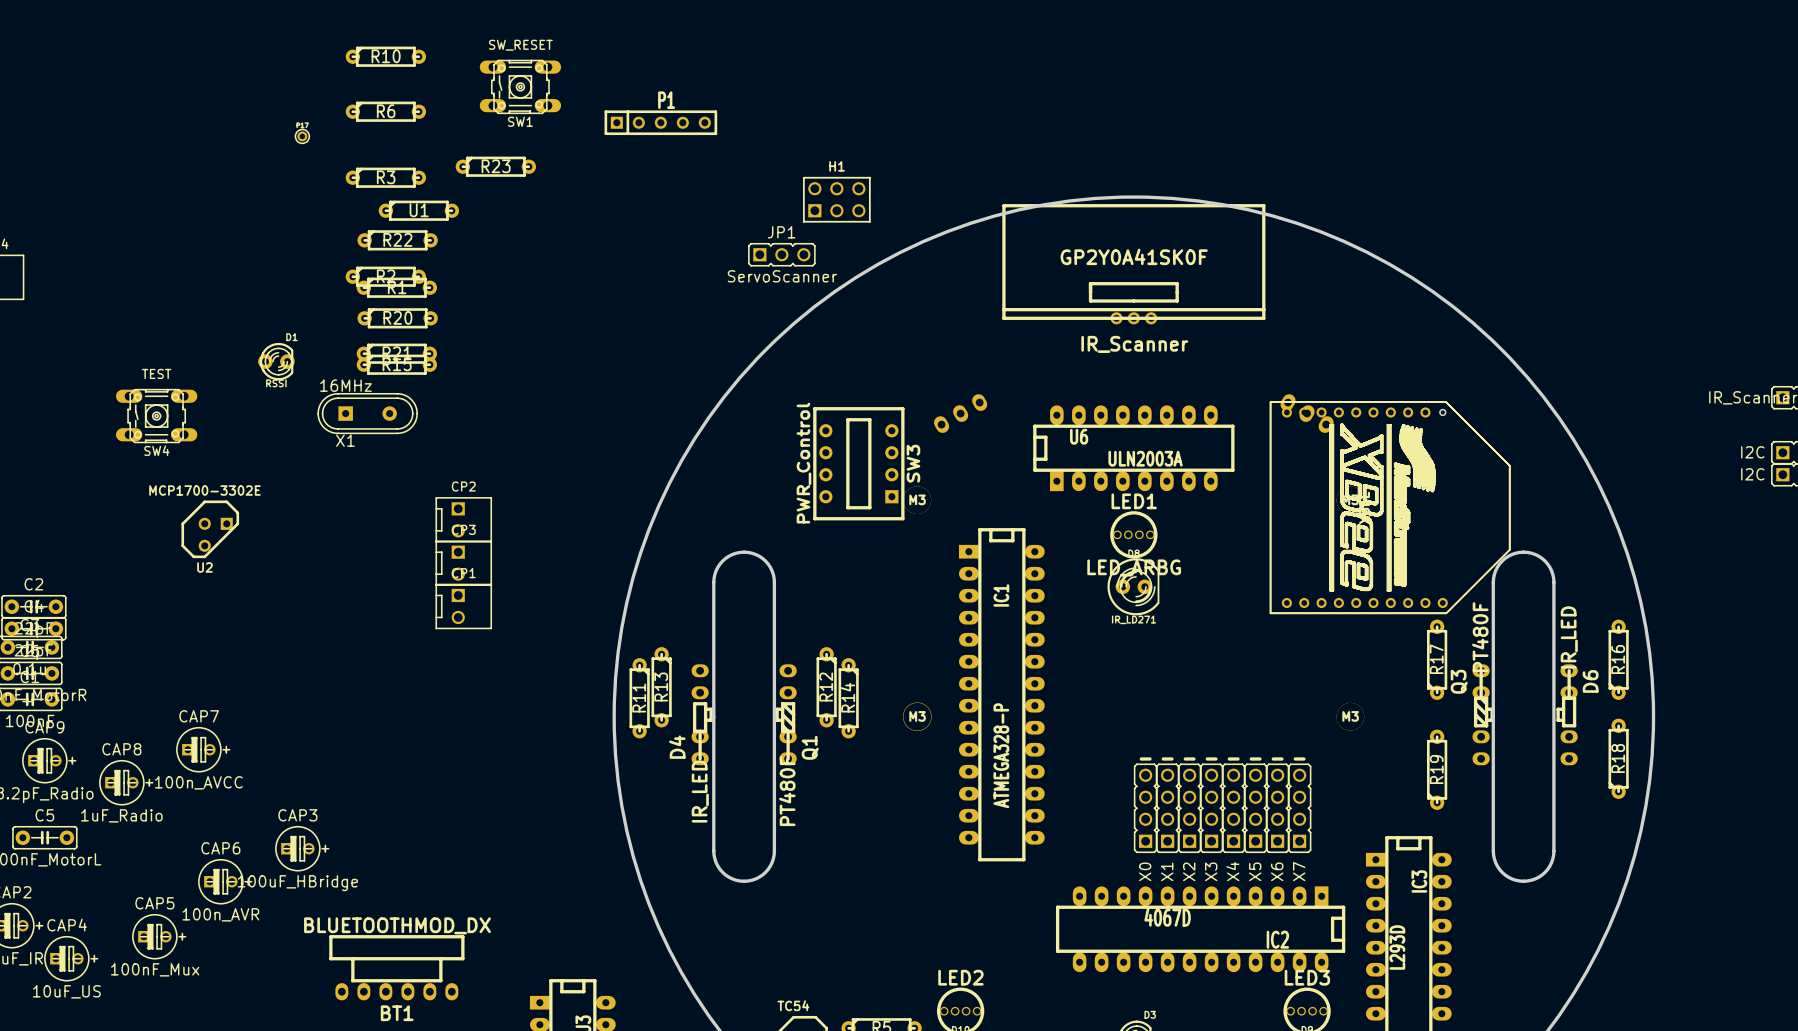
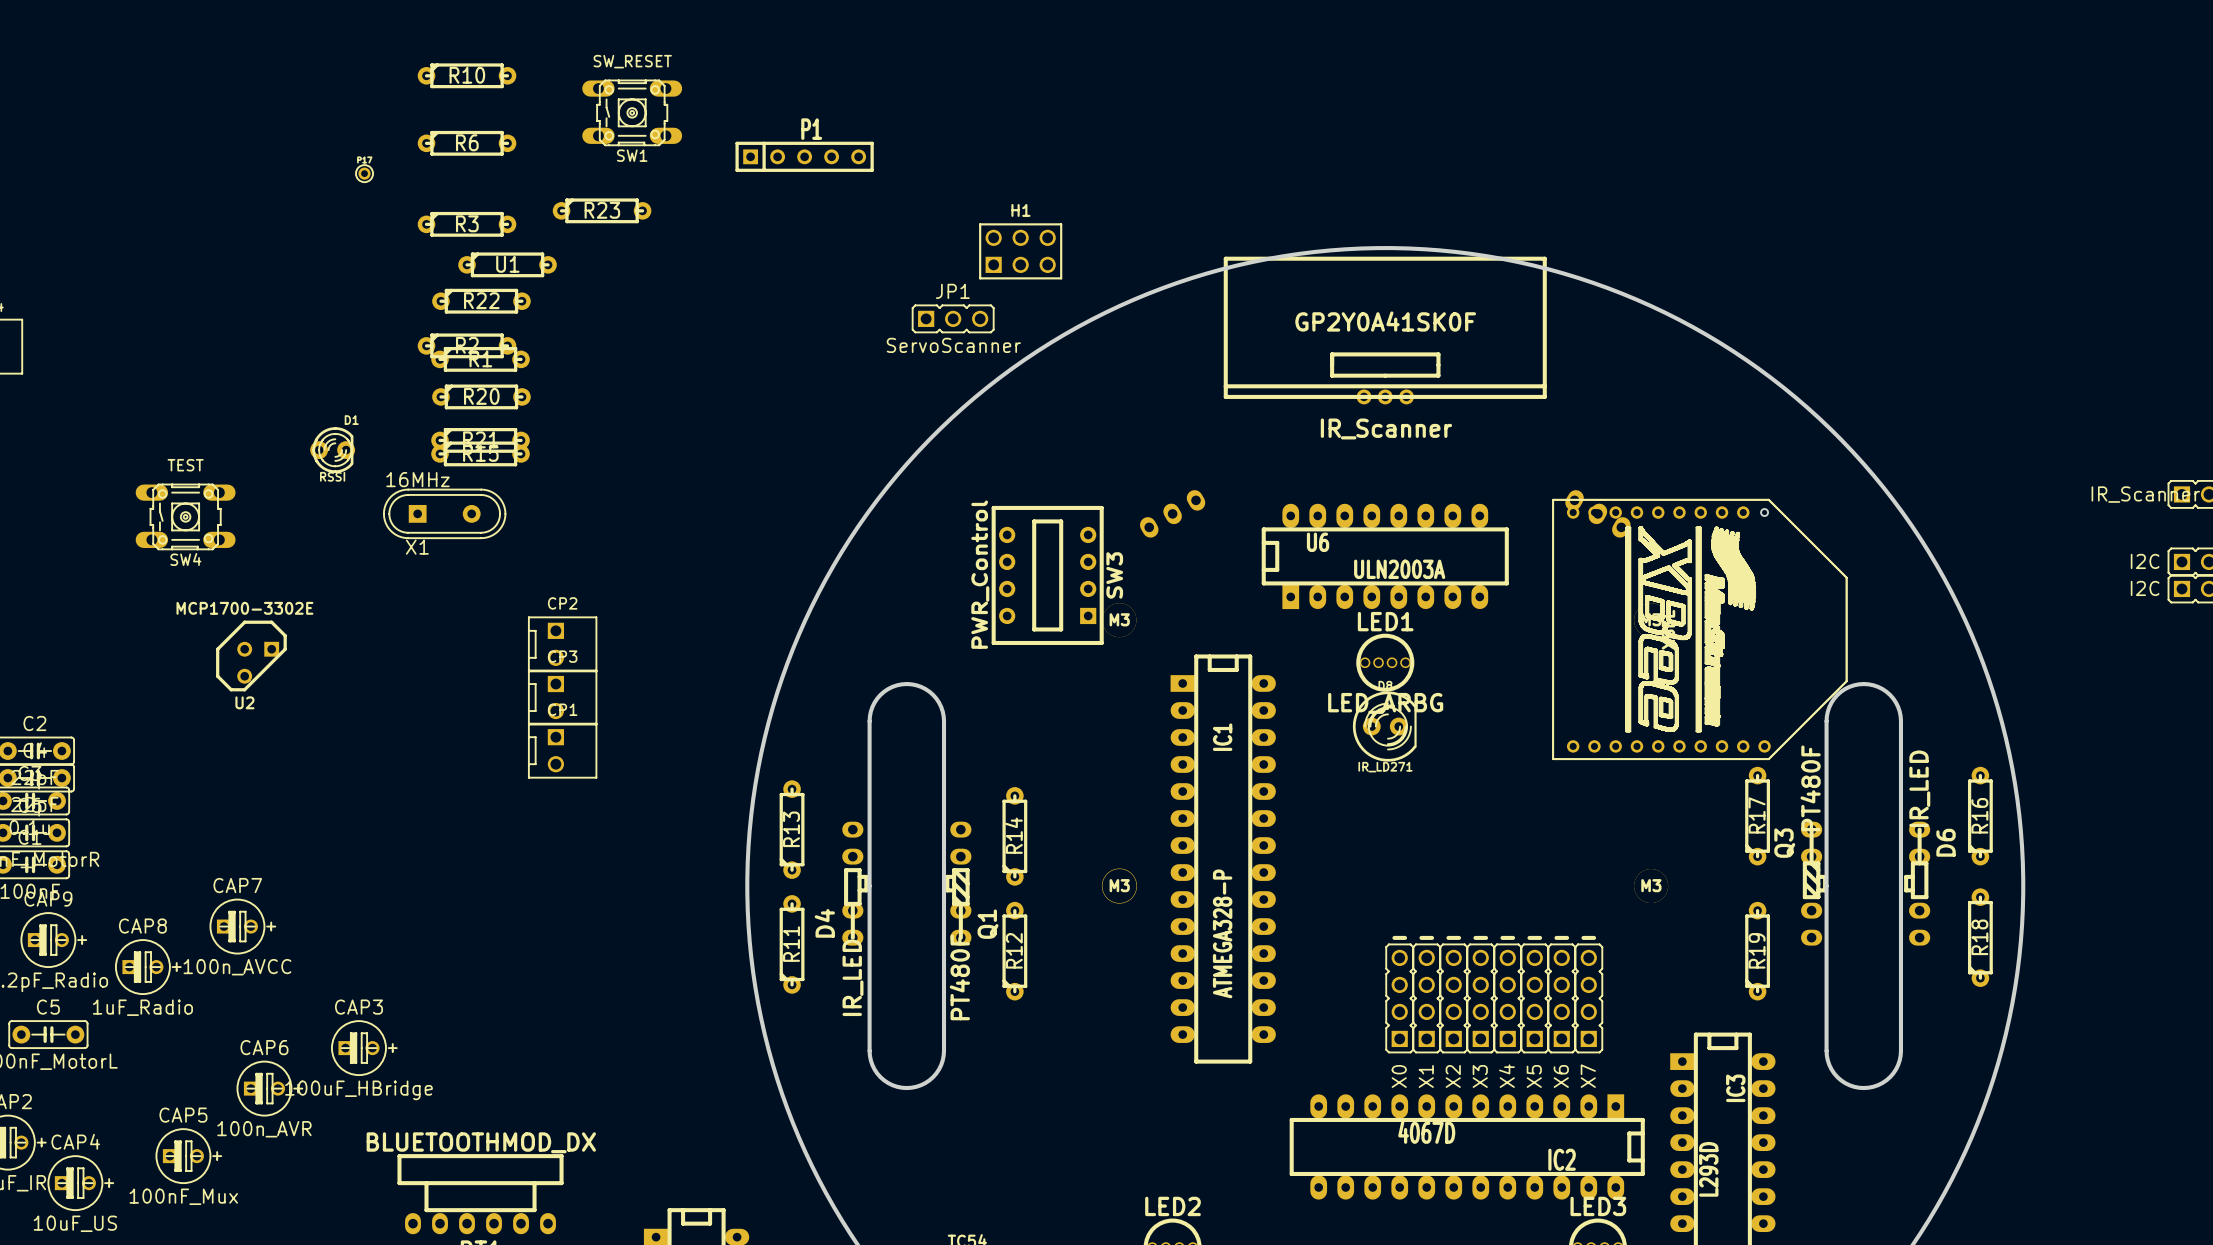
R13 rotation: 0° (661, 687) -> 180° (792, 829)
R12 rotation: 0° (826, 687) -> 180° (1014, 951)
R12 position: (826, 687) -> (1014, 951)
R11 rotation: 0° (639, 698) -> 180° (792, 944)
R11 position: (639, 698) -> (792, 944)
R14 rotation: 0° (848, 698) -> 180° (1014, 836)

